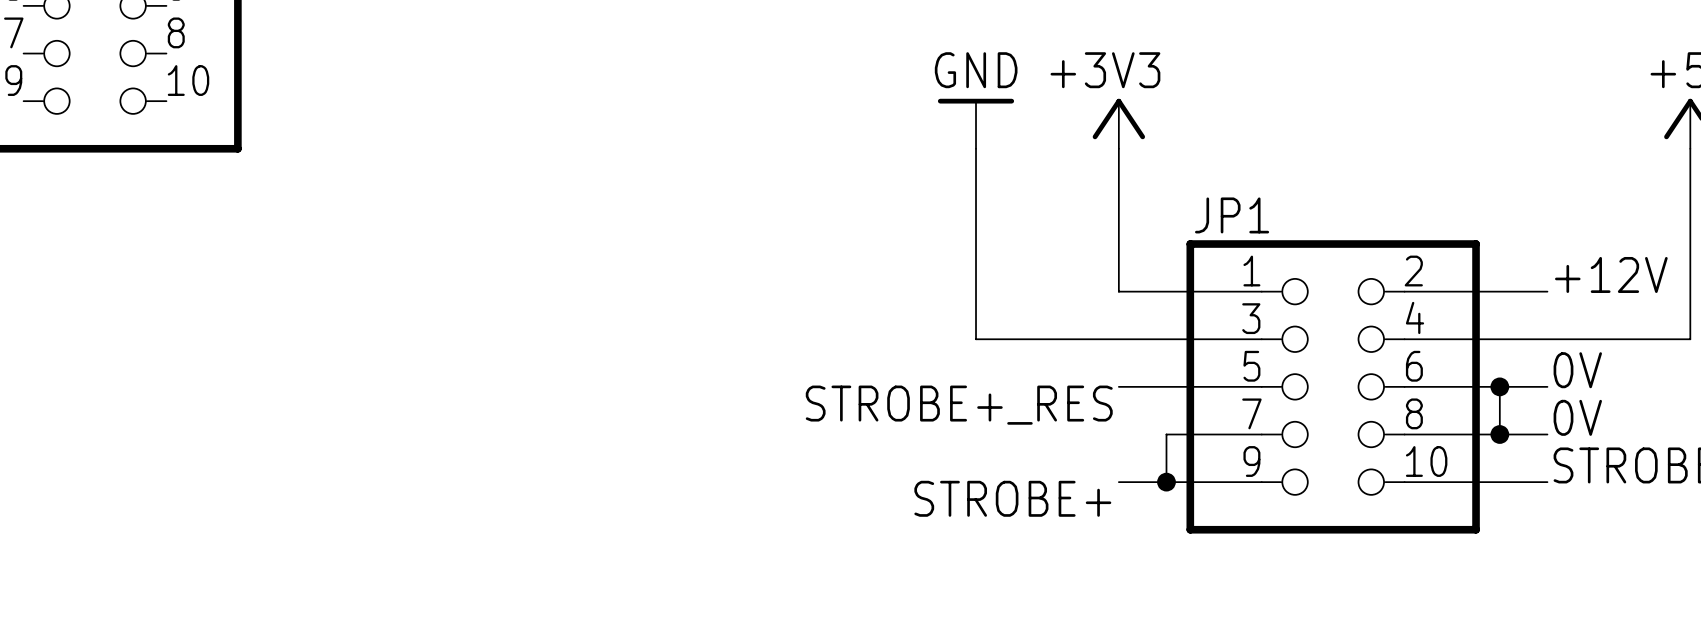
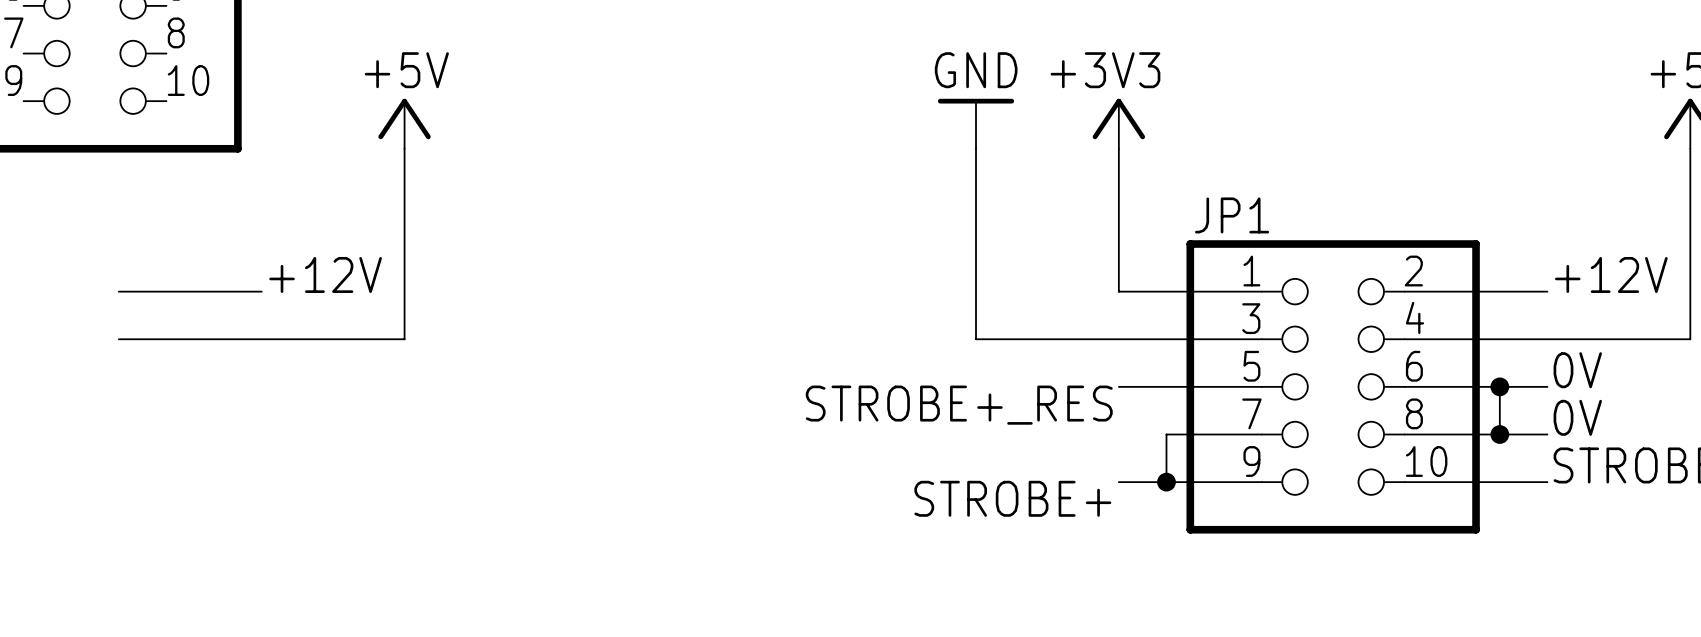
power symbol: none -> +5V (404, 123)
wire: none -> (404, 148) (404, 339) (118, 339)
label: none -> +12V (325, 274)
wire: none -> (118, 291) (261, 291)

